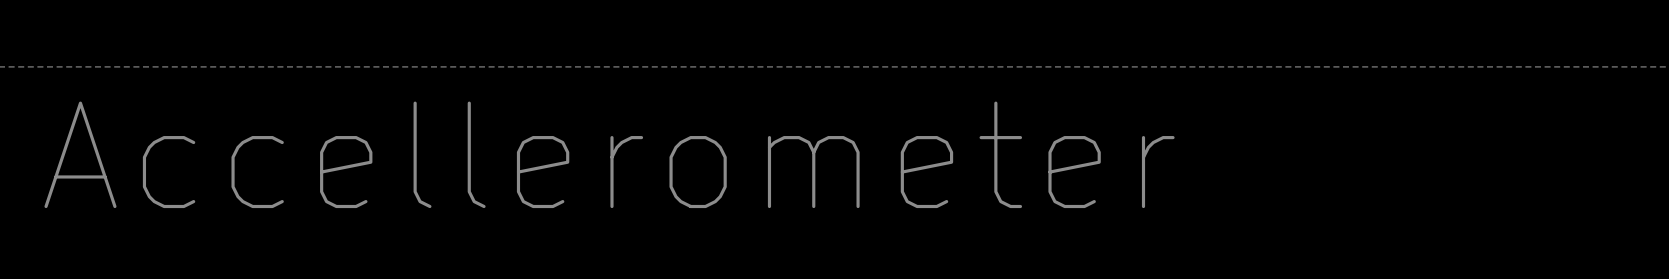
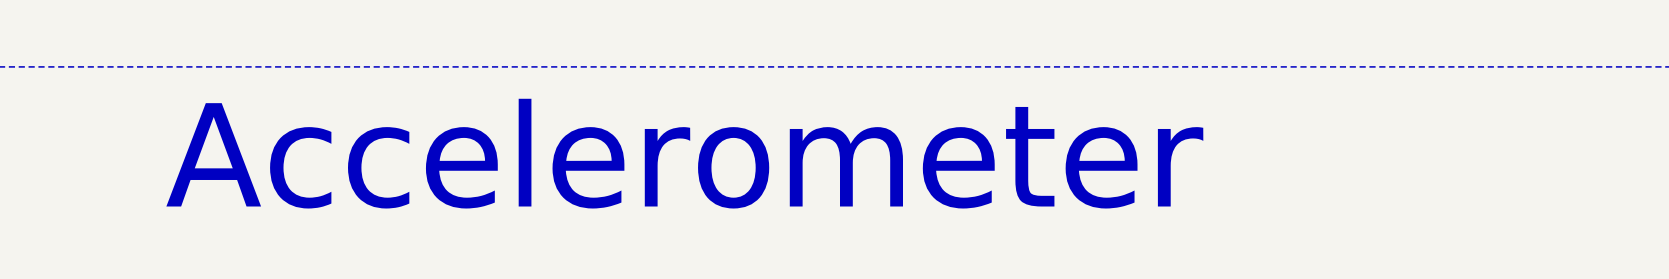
text: Accellerometer (609, 154) -> Accelerometer (684, 153)

